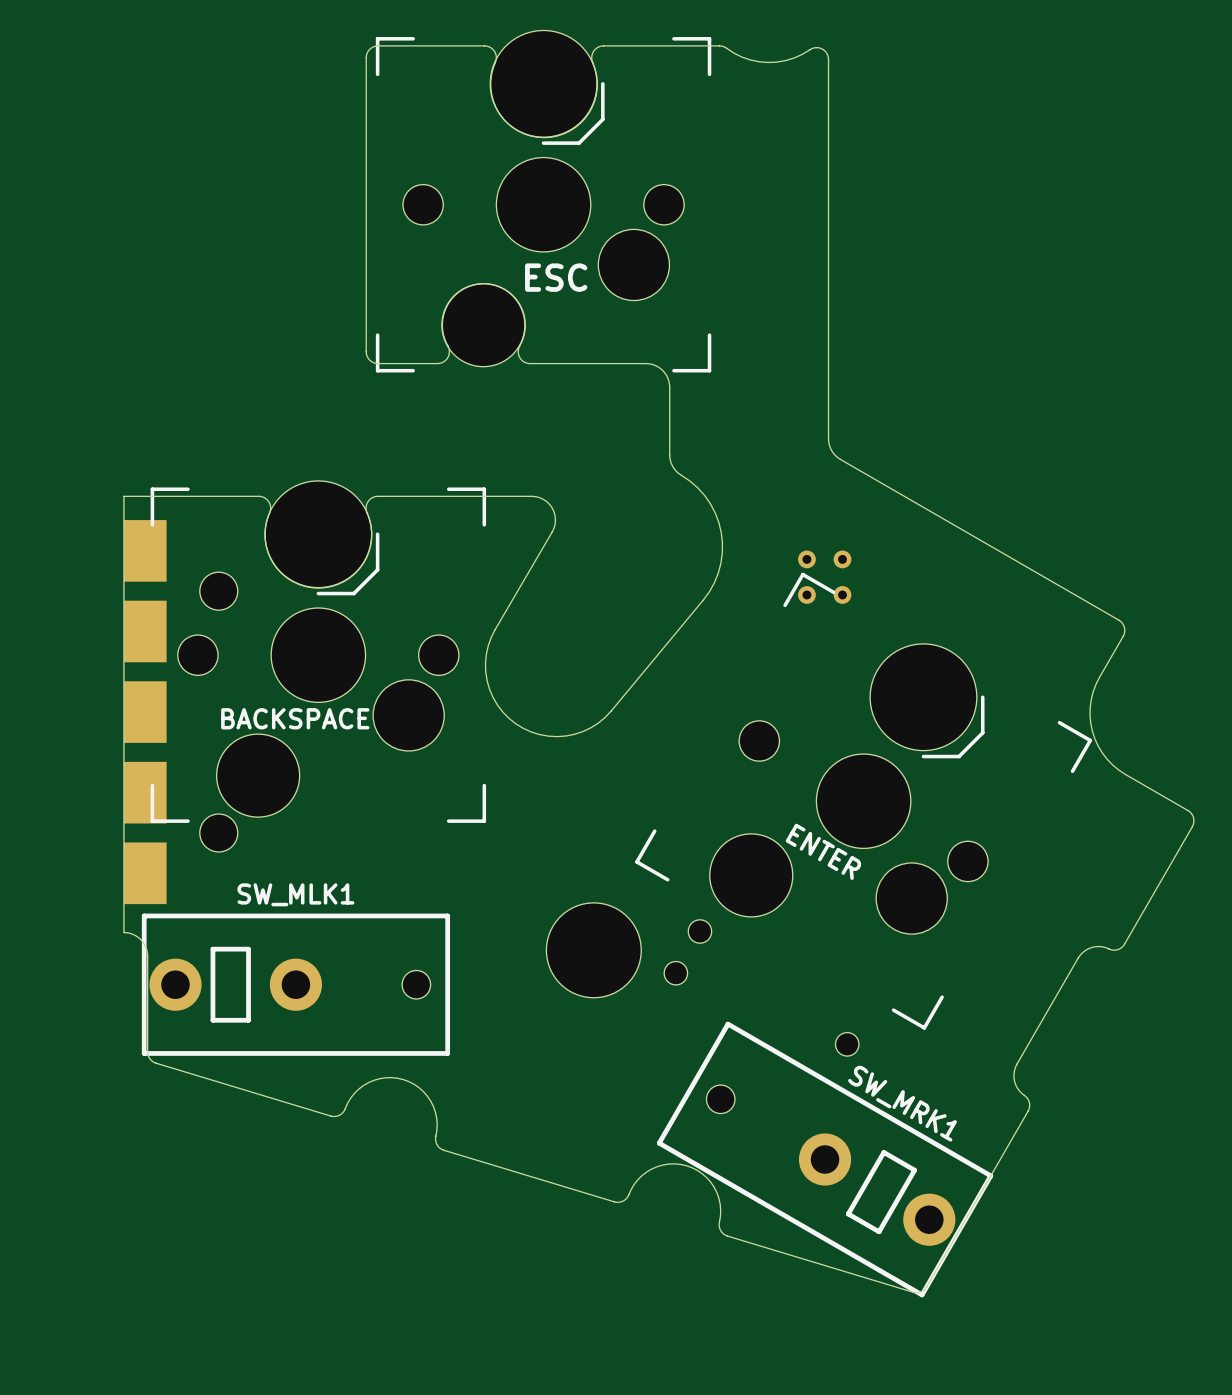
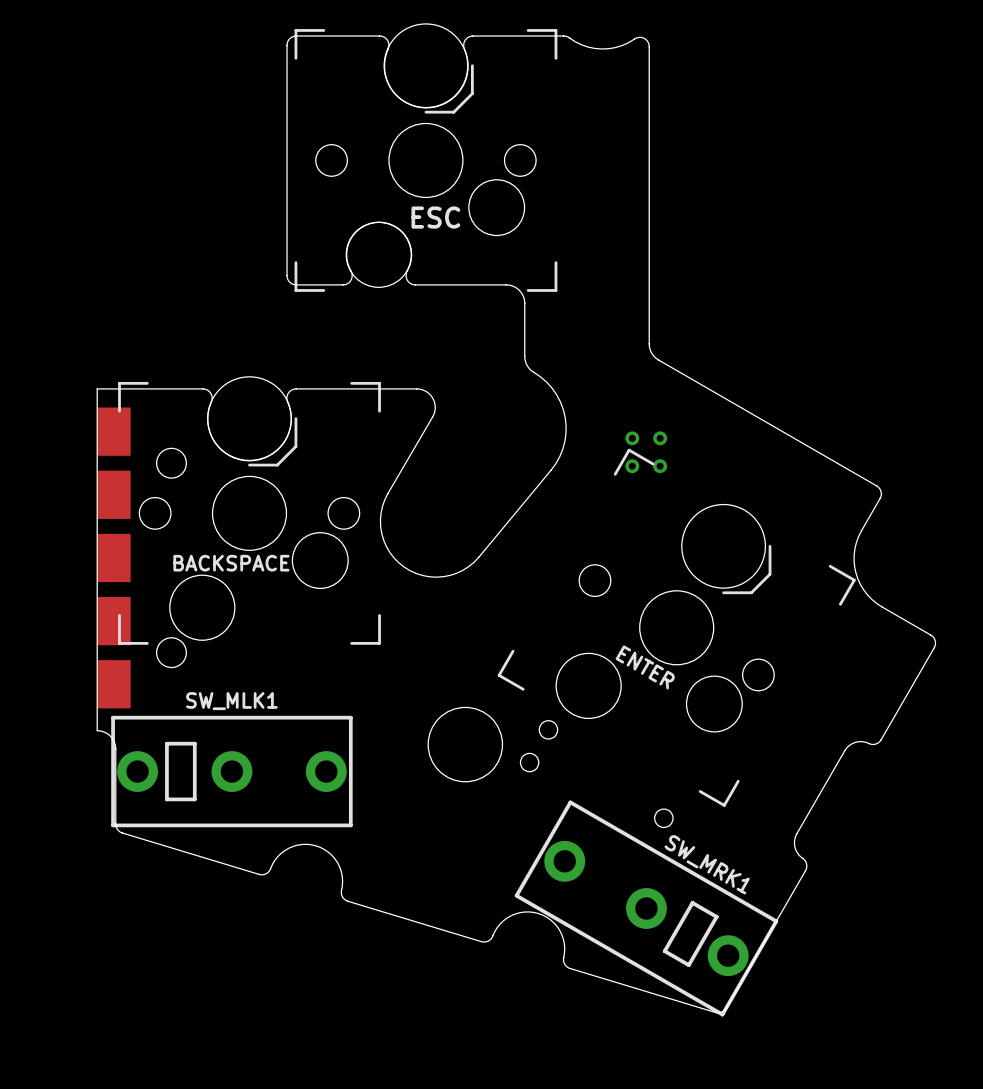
SW_MLK1 footprint: [141, 913, 451, 1056] -> [111, 715, 353, 828]
SW_MRK1 footprint: [656, 1021, 994, 1298] -> [514, 800, 779, 1017]

